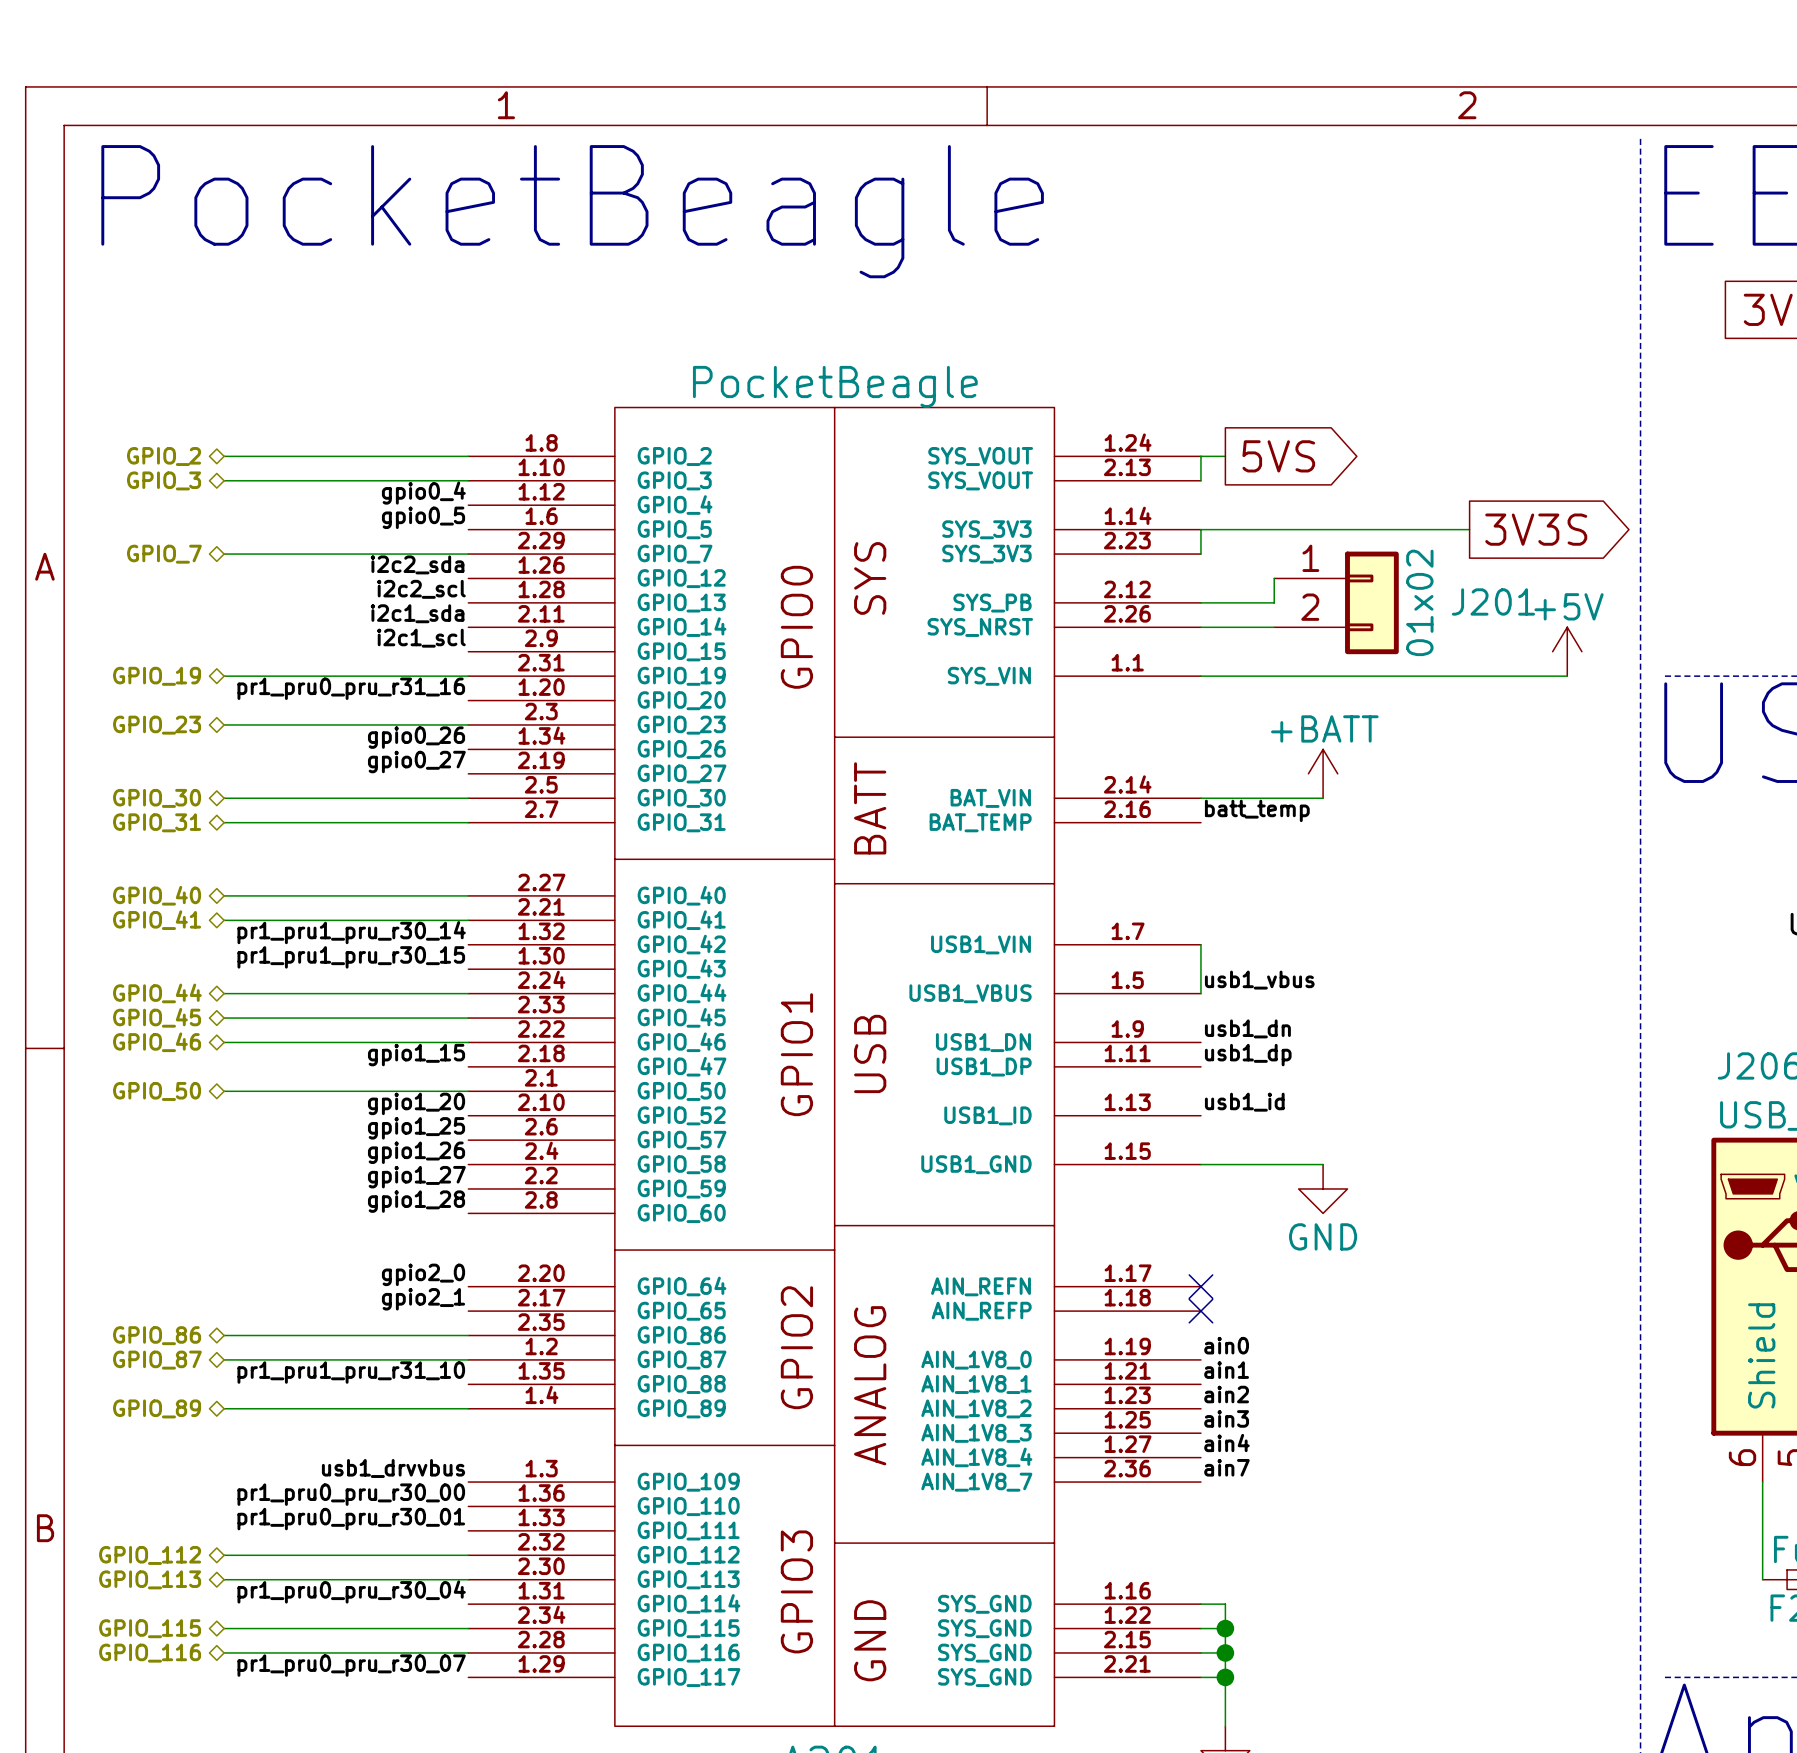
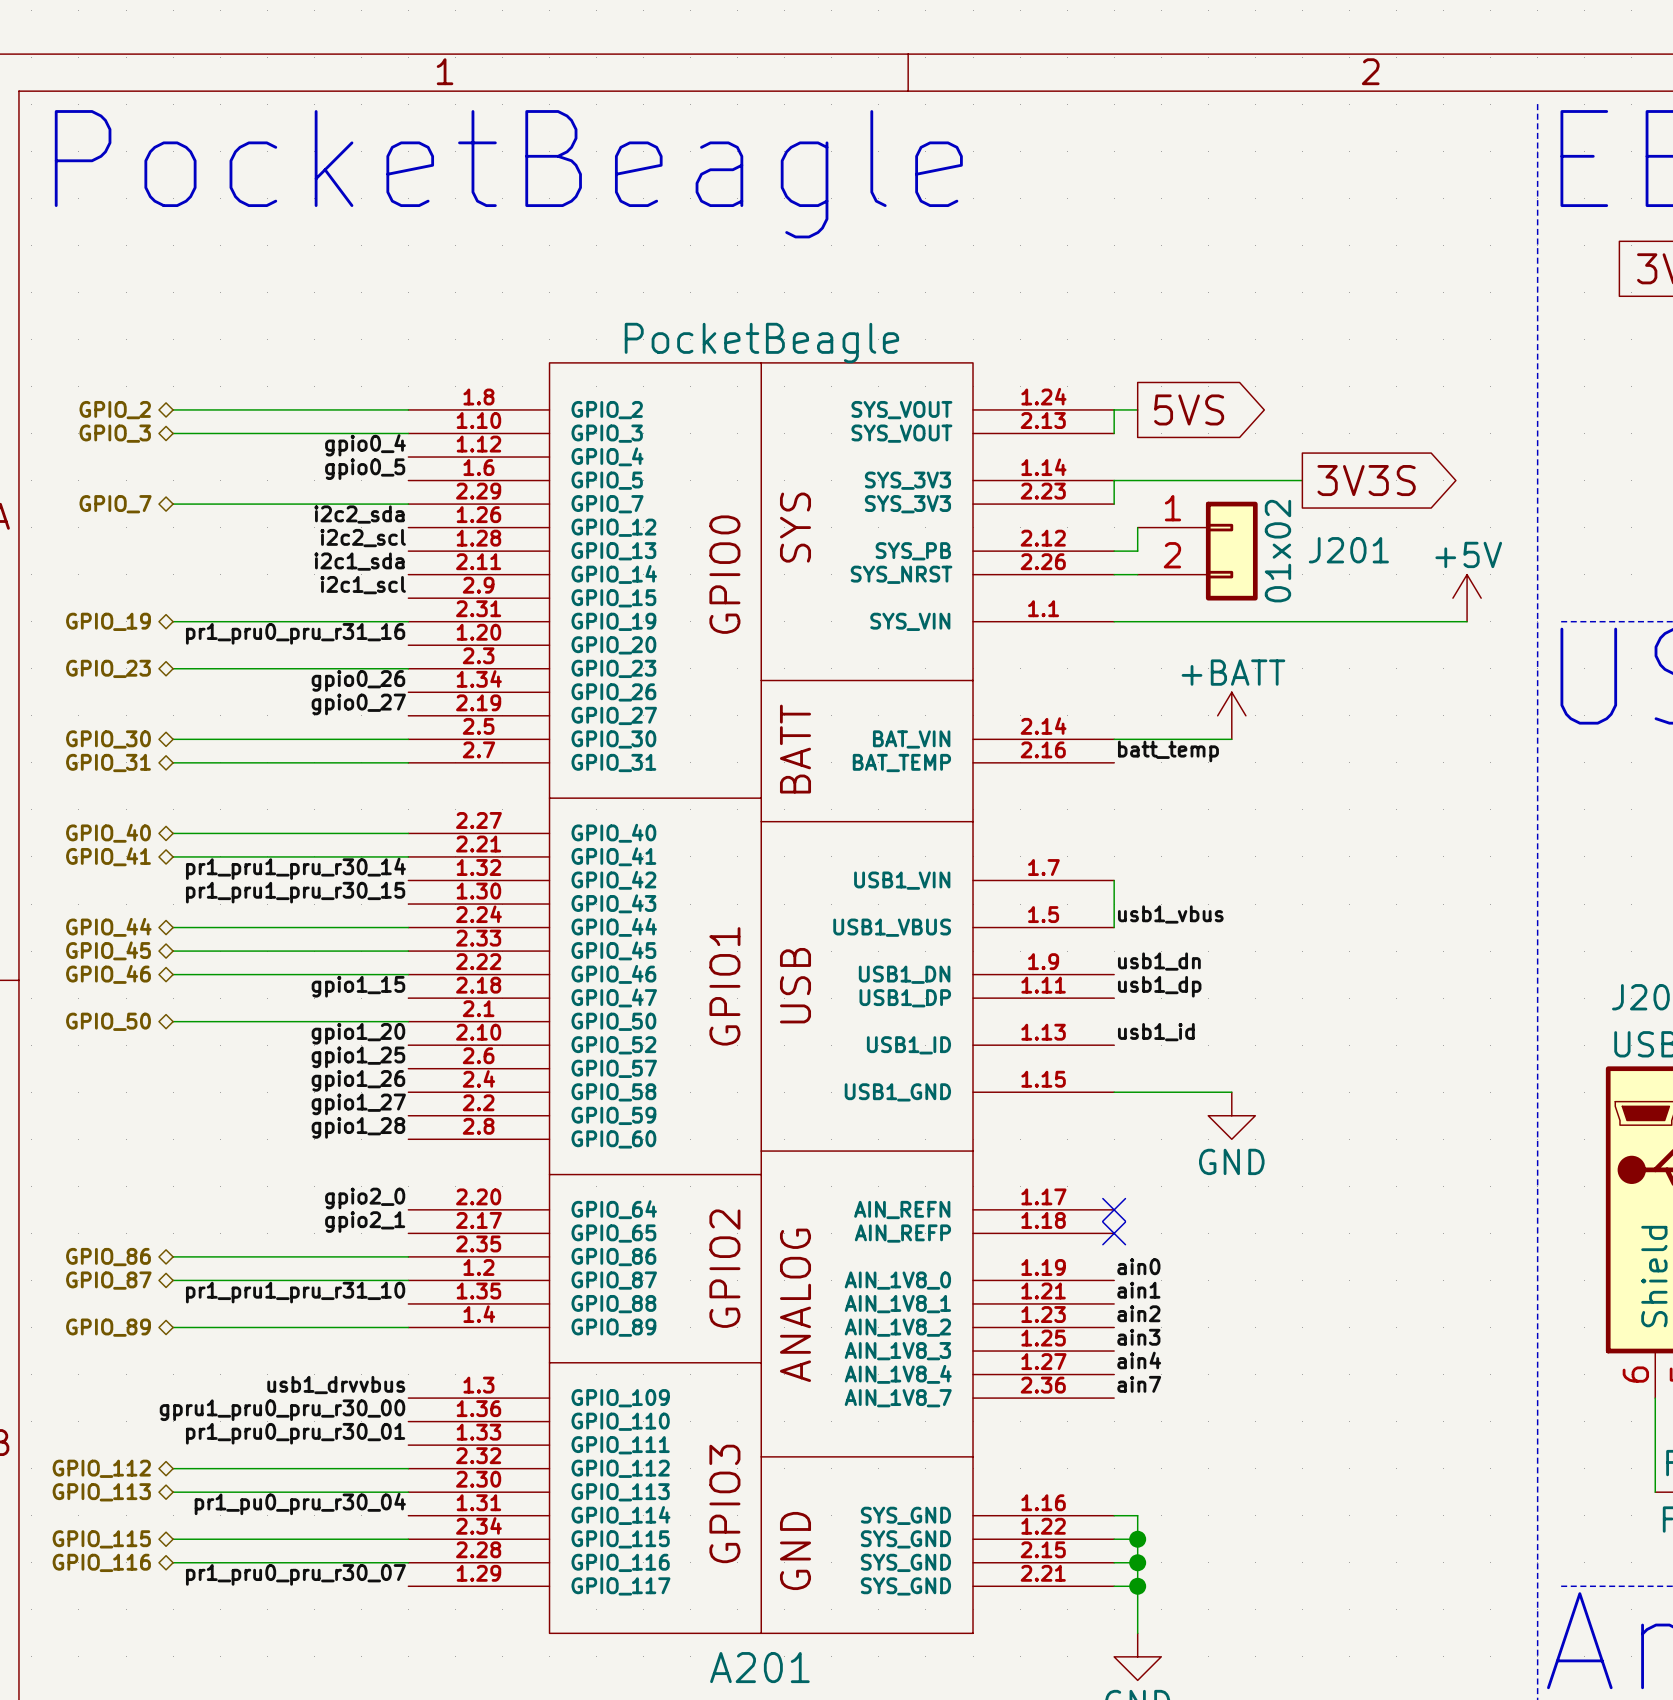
wire: (1396, 529) (1469, 529) -> none
global label position: 3V3S (1536, 529) -> 3V3S (1366, 480)
wire: (1274, 578) (1274, 602) (1225, 602) -> (1137, 527) (1137, 551)
J201 position: (1336, 602) -> (1197, 551)
label: pr1_pru0_pru_r30_00 (351, 1494) -> gpru1_pru0_pru_r30_00 (282, 1410)
label: pr1_pru0_pru_r30_04 (351, 1591) -> pr1_pu0_pru_r30_04 (300, 1503)

